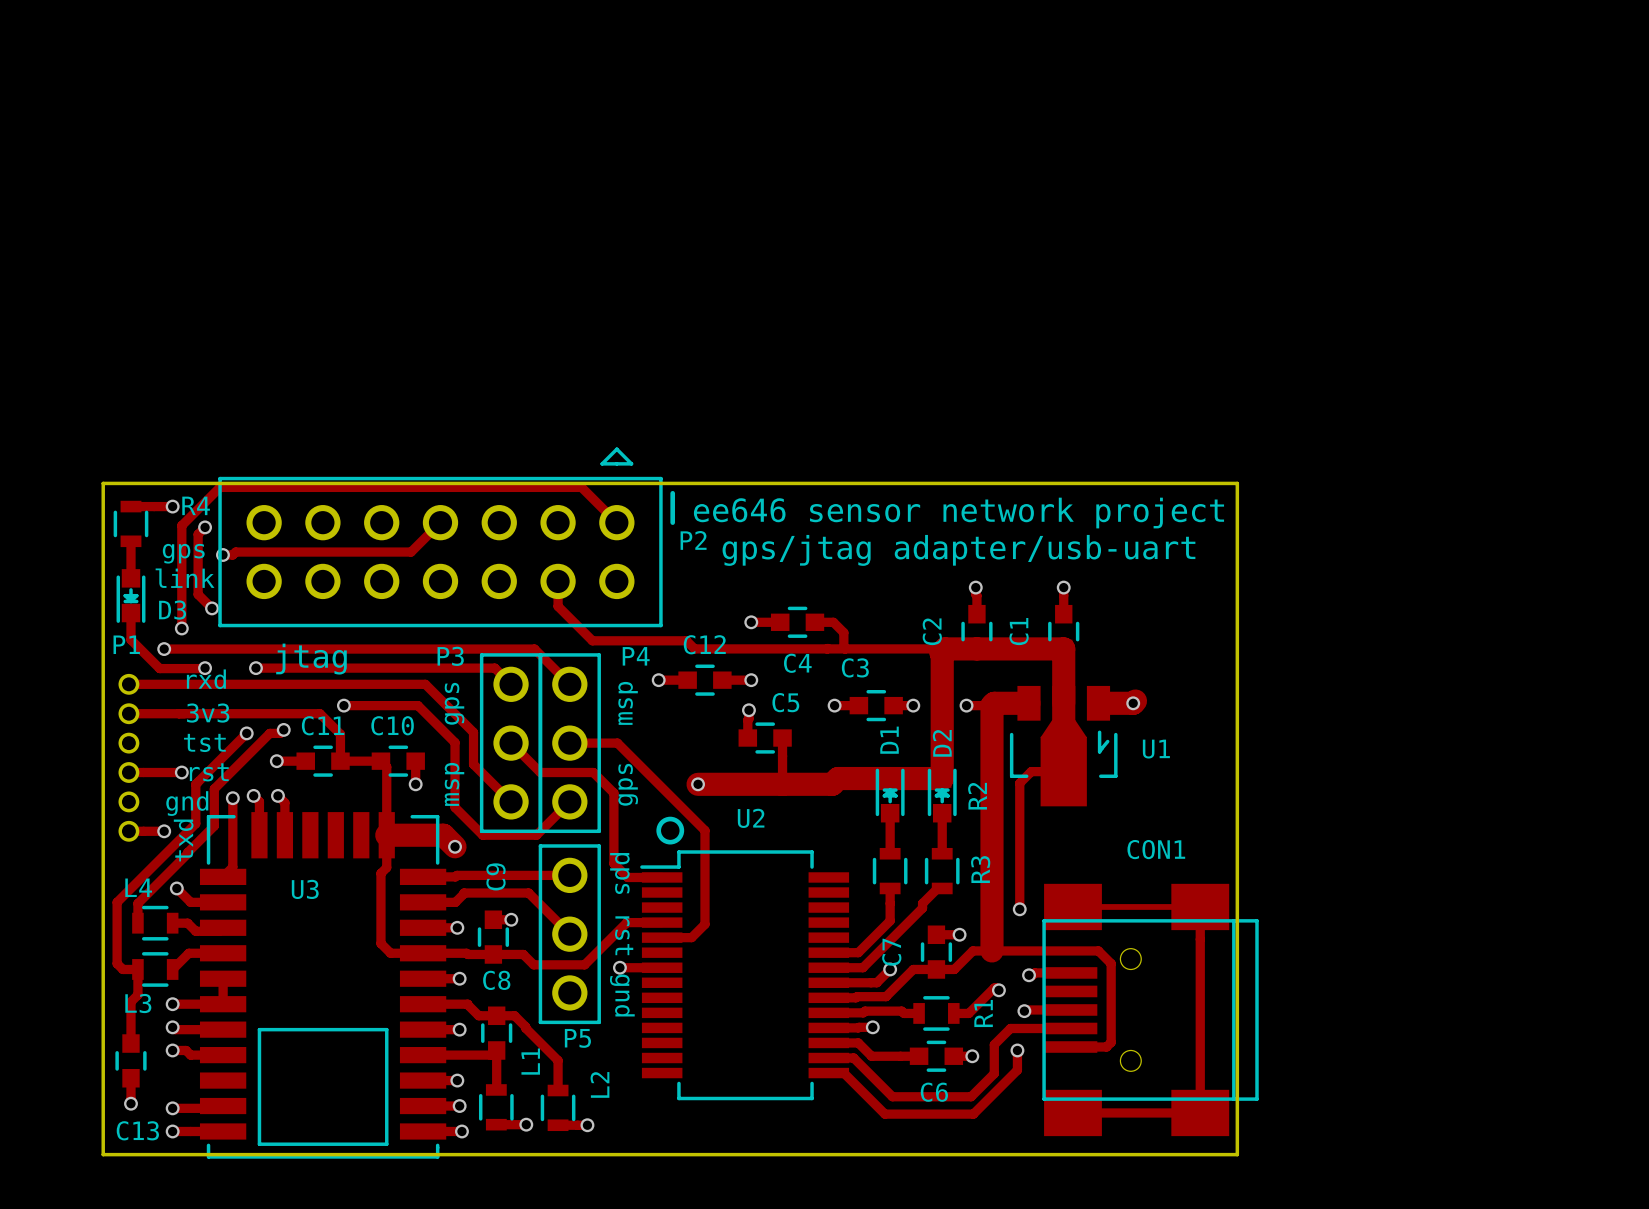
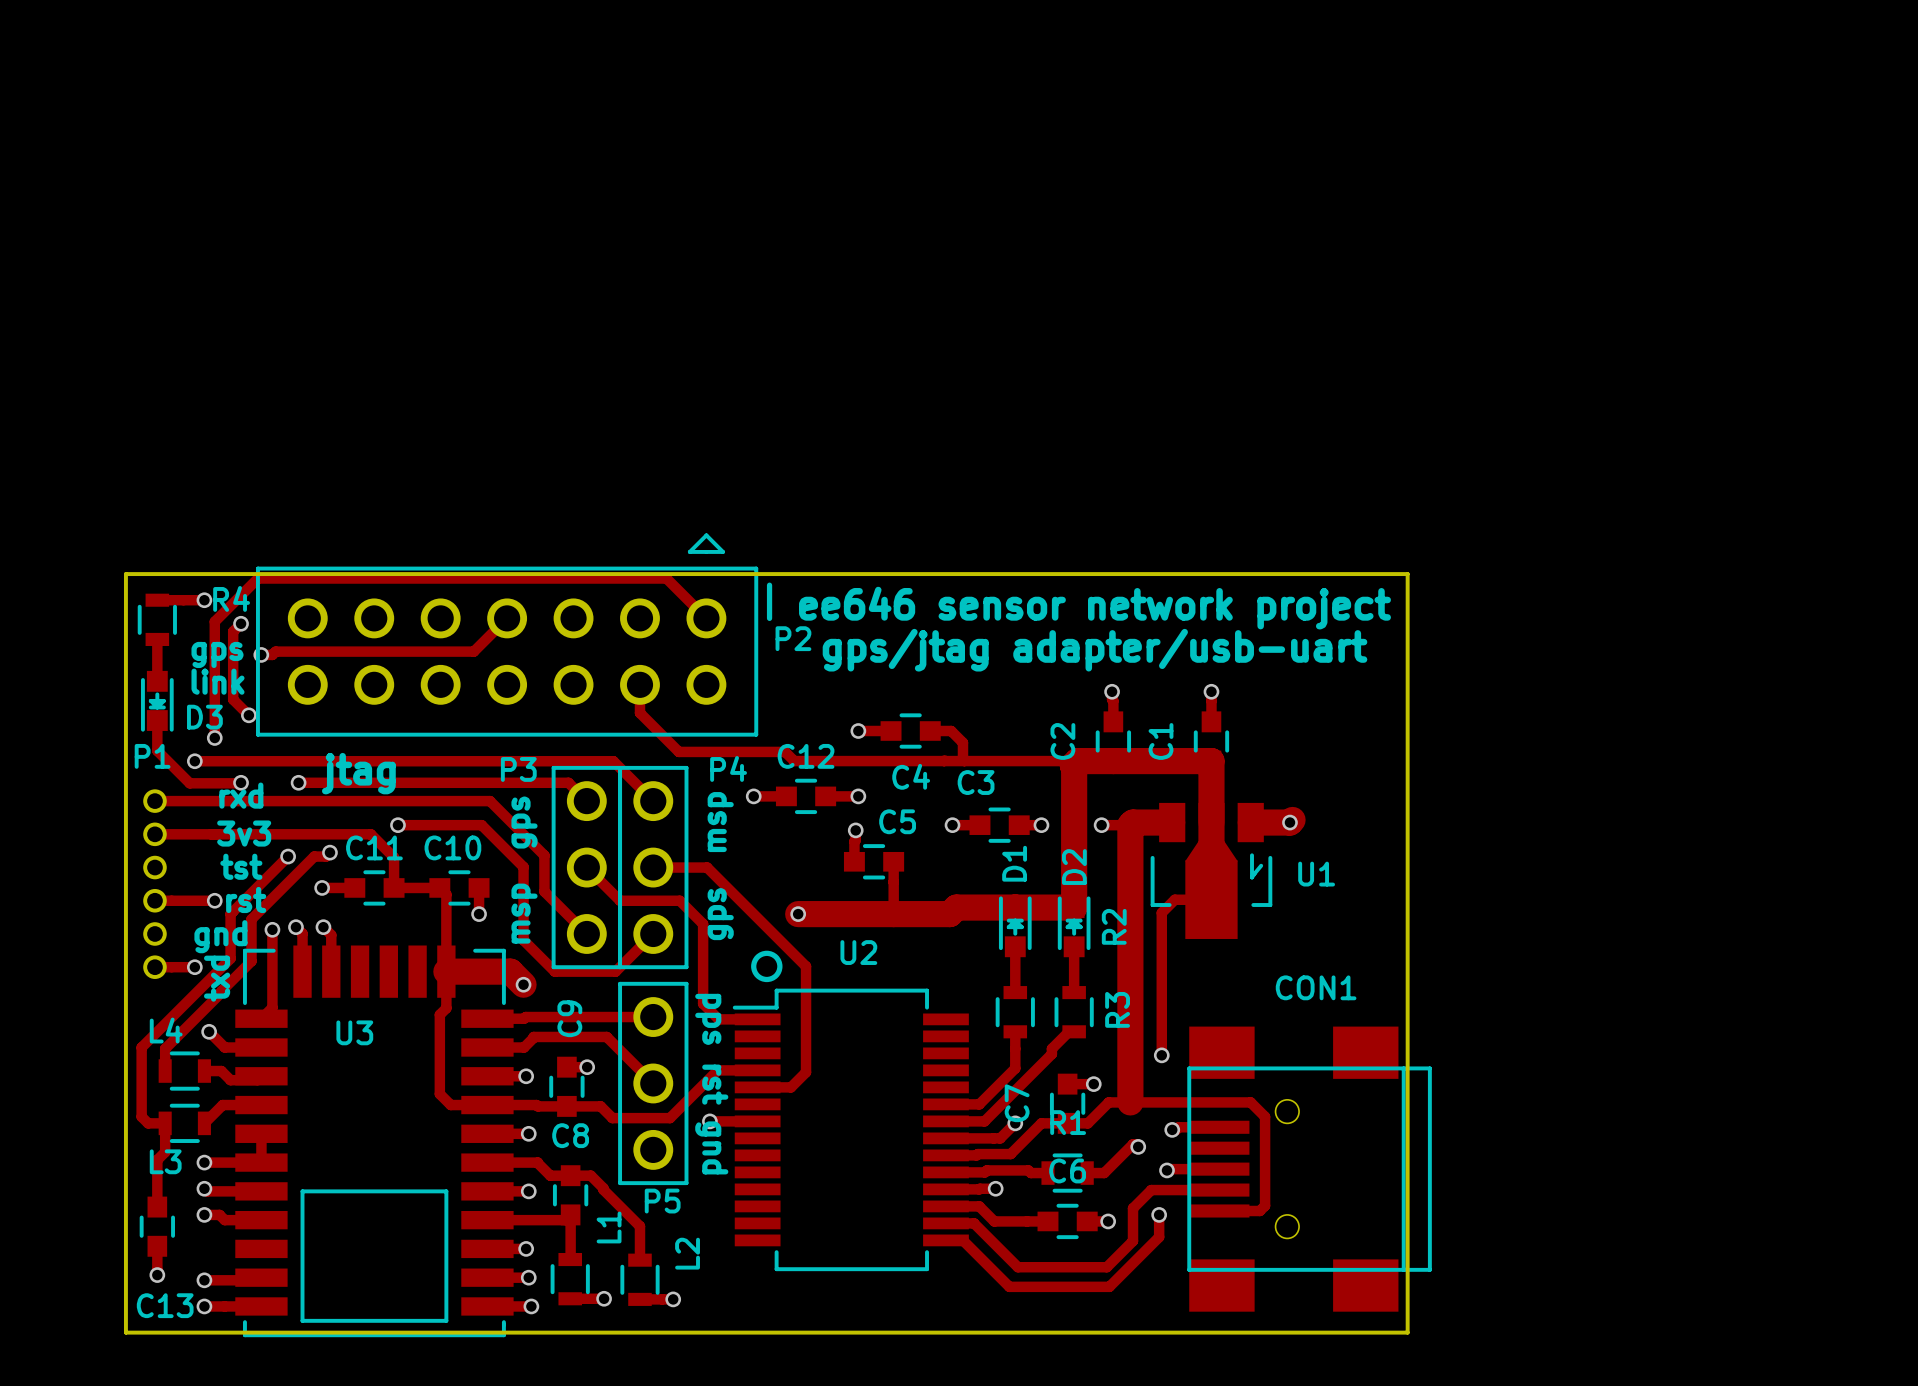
track: (1072, 906) (1200, 906) (1200, 1112) (1072, 1112) -> none
R1 name rotation: 0° (983, 1013) -> 90° clockwise (1068, 1122)
R1 name position: R1 (983, 1013) -> R1 (1068, 1122)
C6 name position: C6 (934, 1092) -> C6 (1067, 1170)

